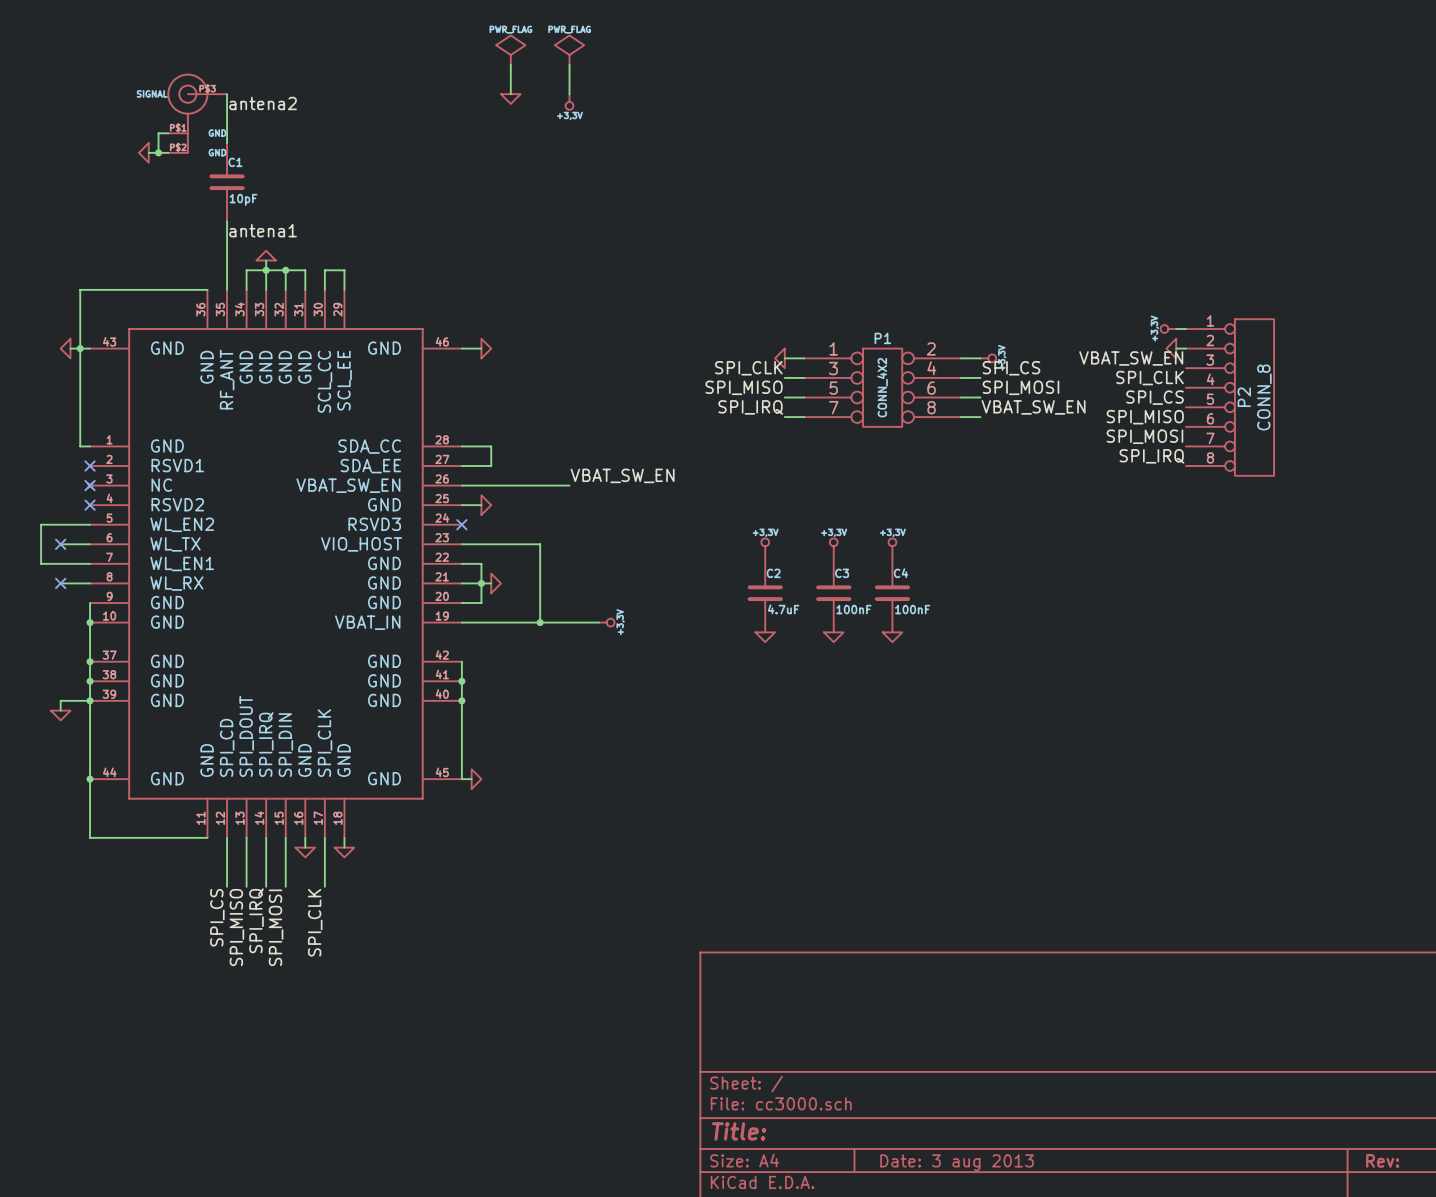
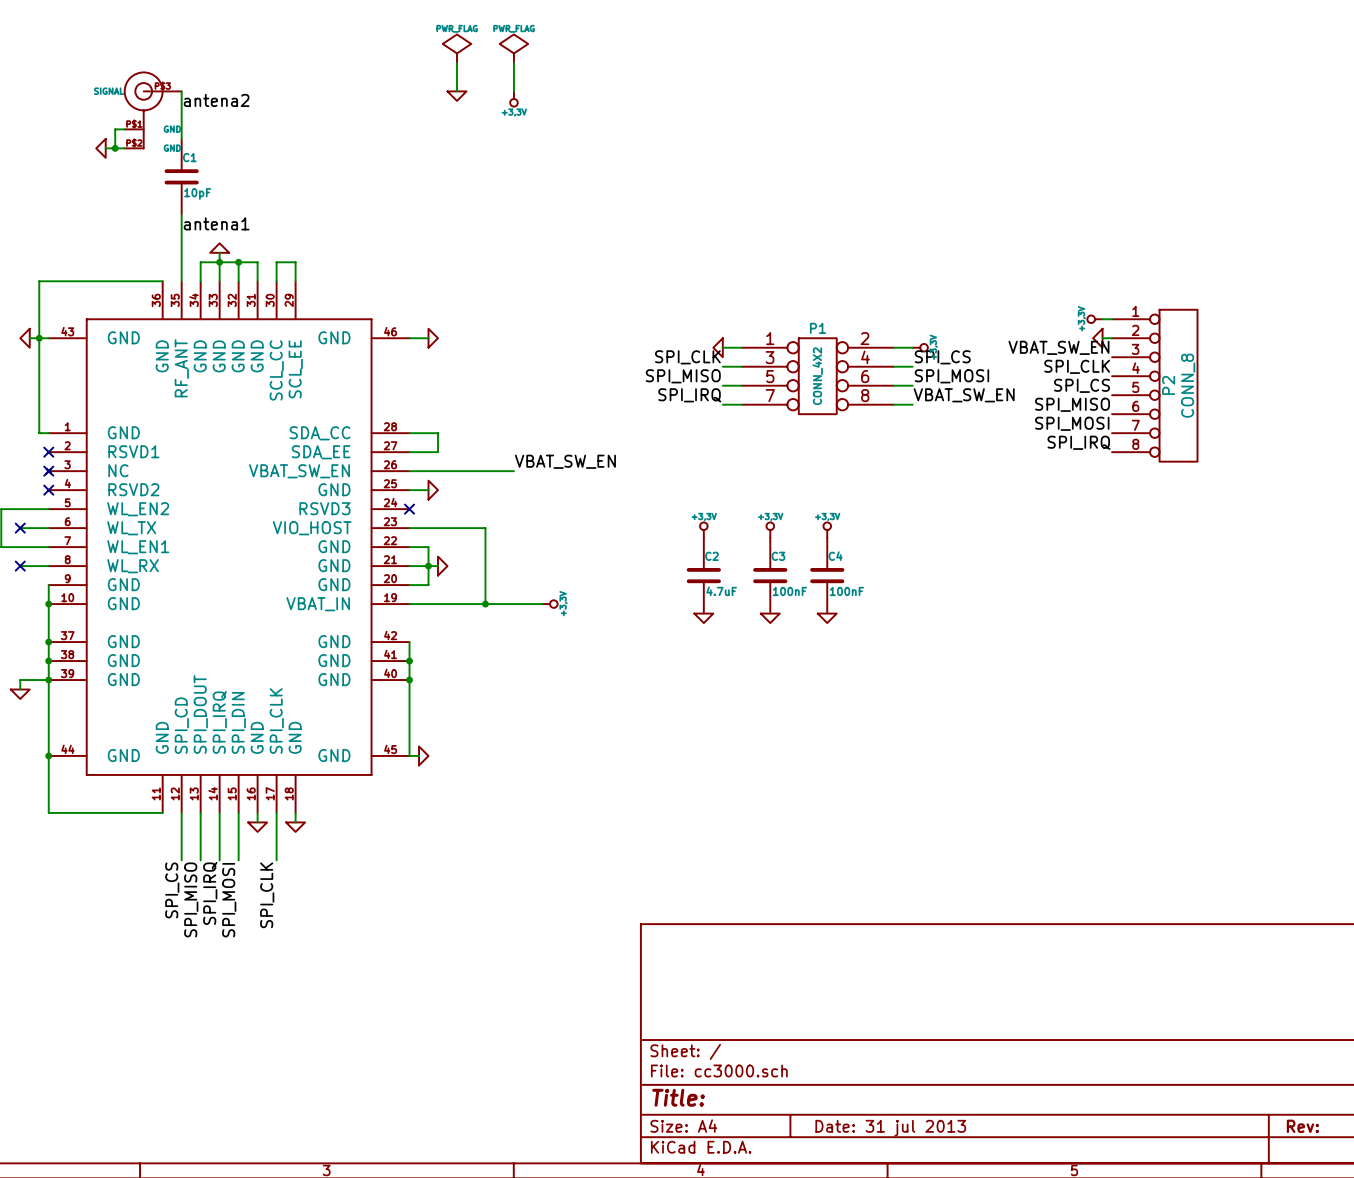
title block: Date: 3 aug 2013 (957, 1162) -> Date: 31 jul 2013 (890, 1128)

